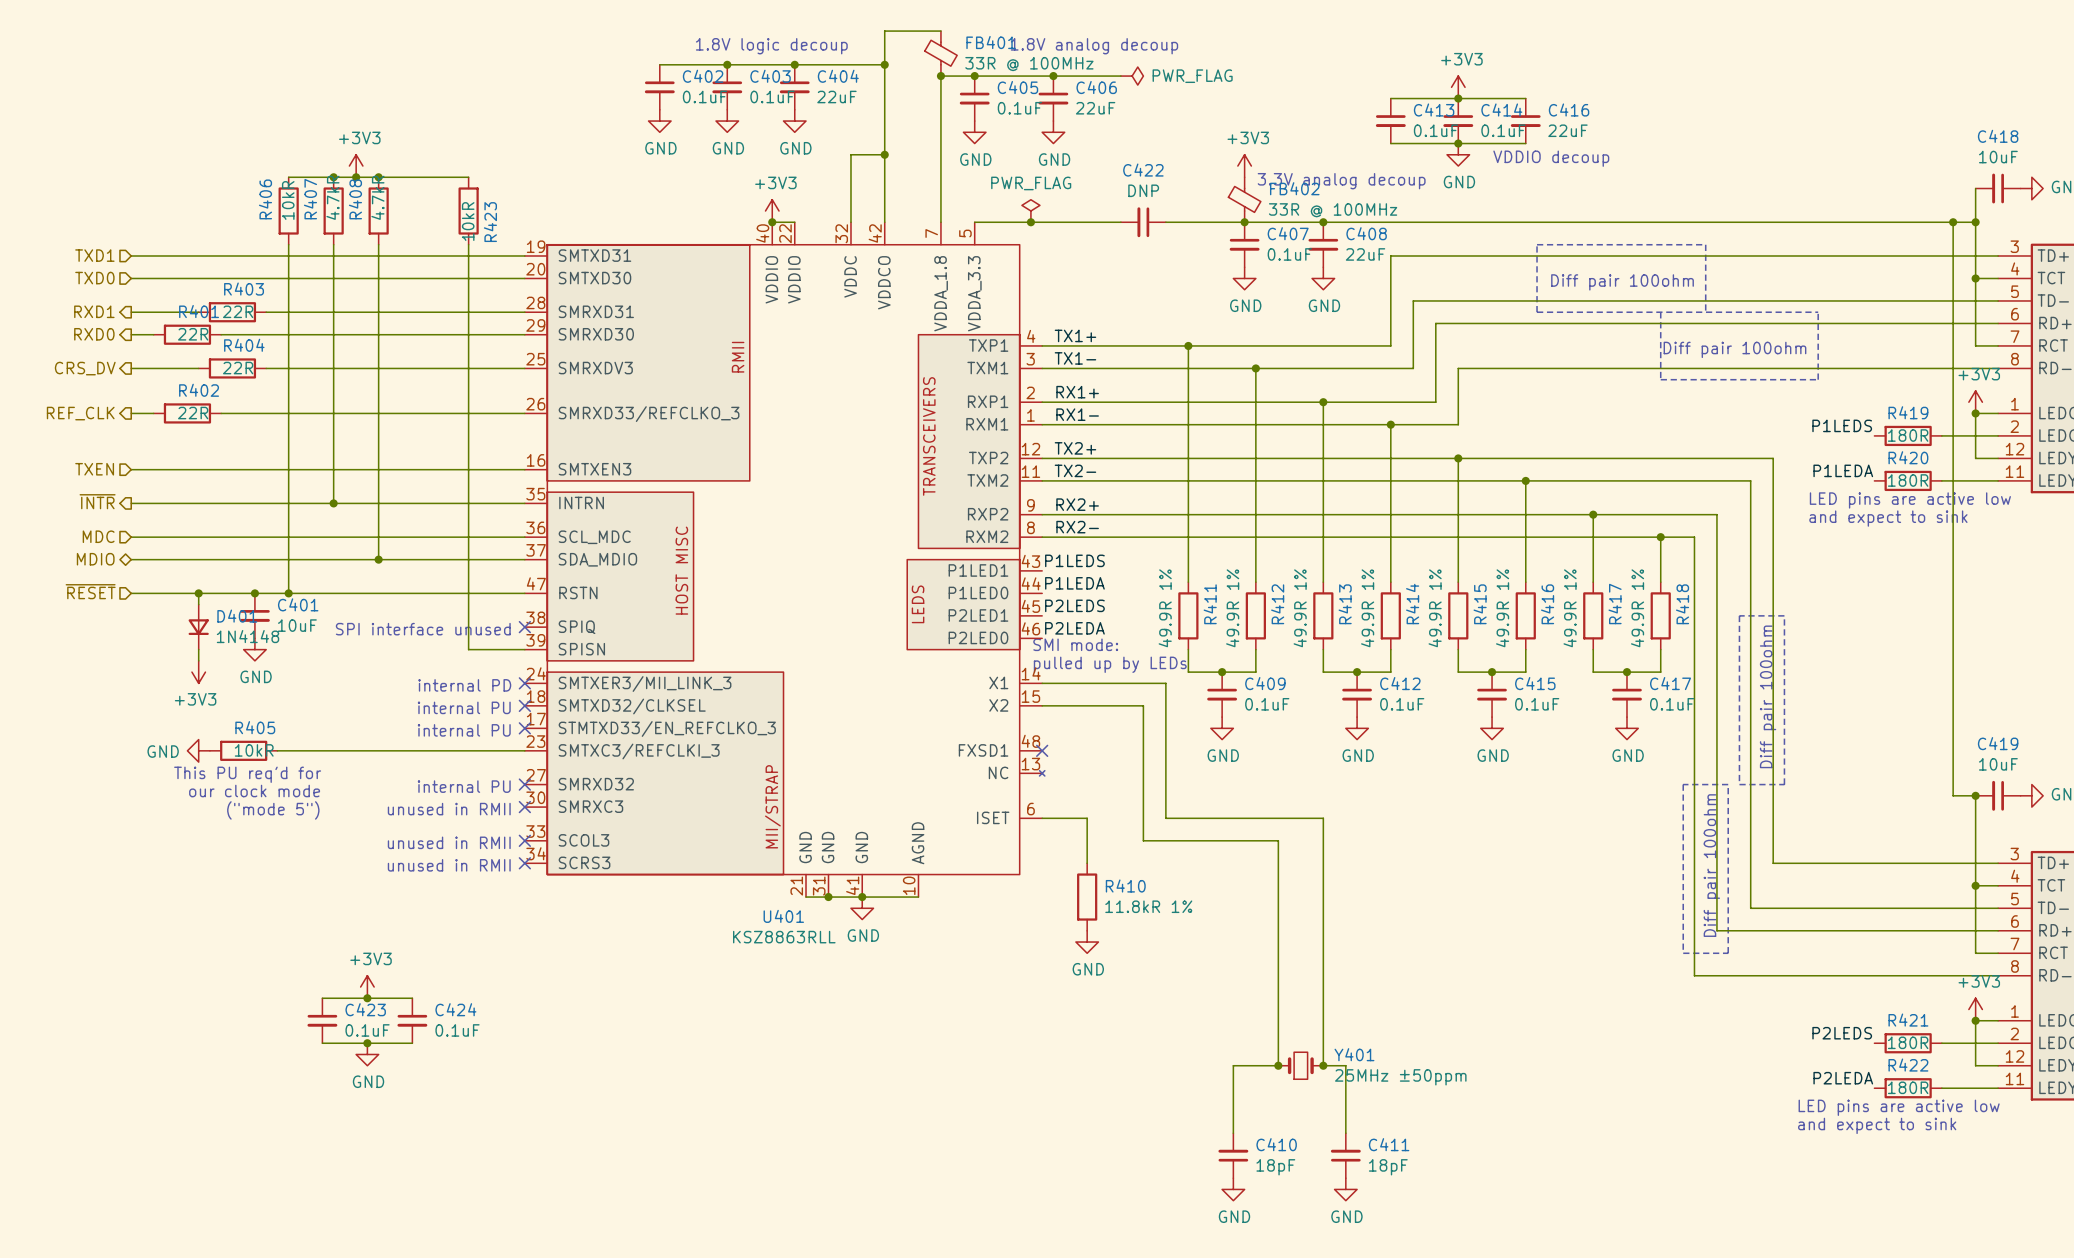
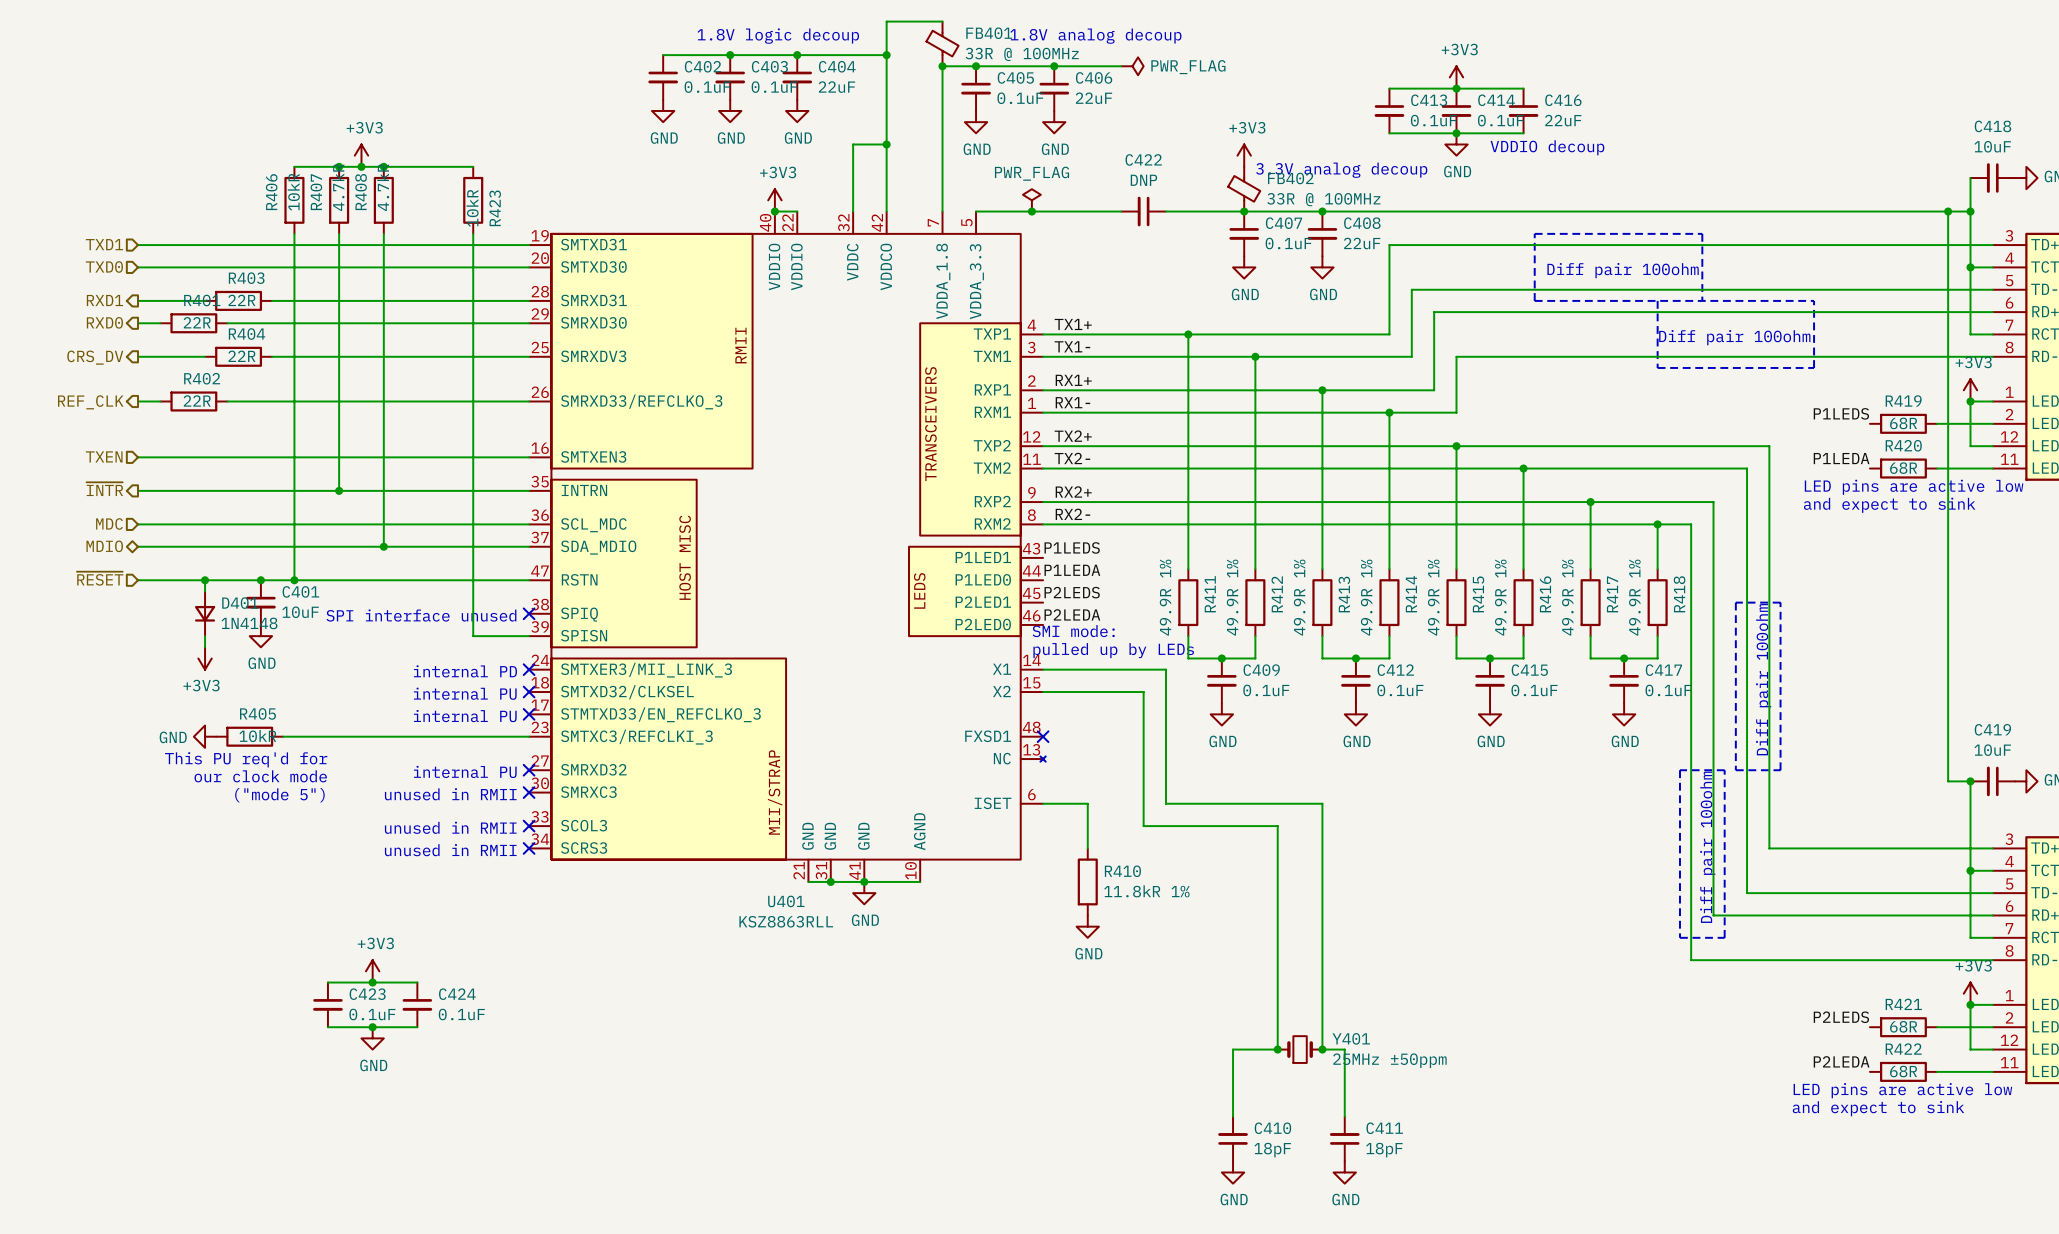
R419 value: 180R (1908, 435) -> 68R (1903, 423)
R420 value: 180R (1908, 480) -> 68R (1903, 468)
R421 value: 180R (1908, 1042) -> 68R (1903, 1026)
R422 value: 180R (1908, 1087) -> 68R (1903, 1071)

